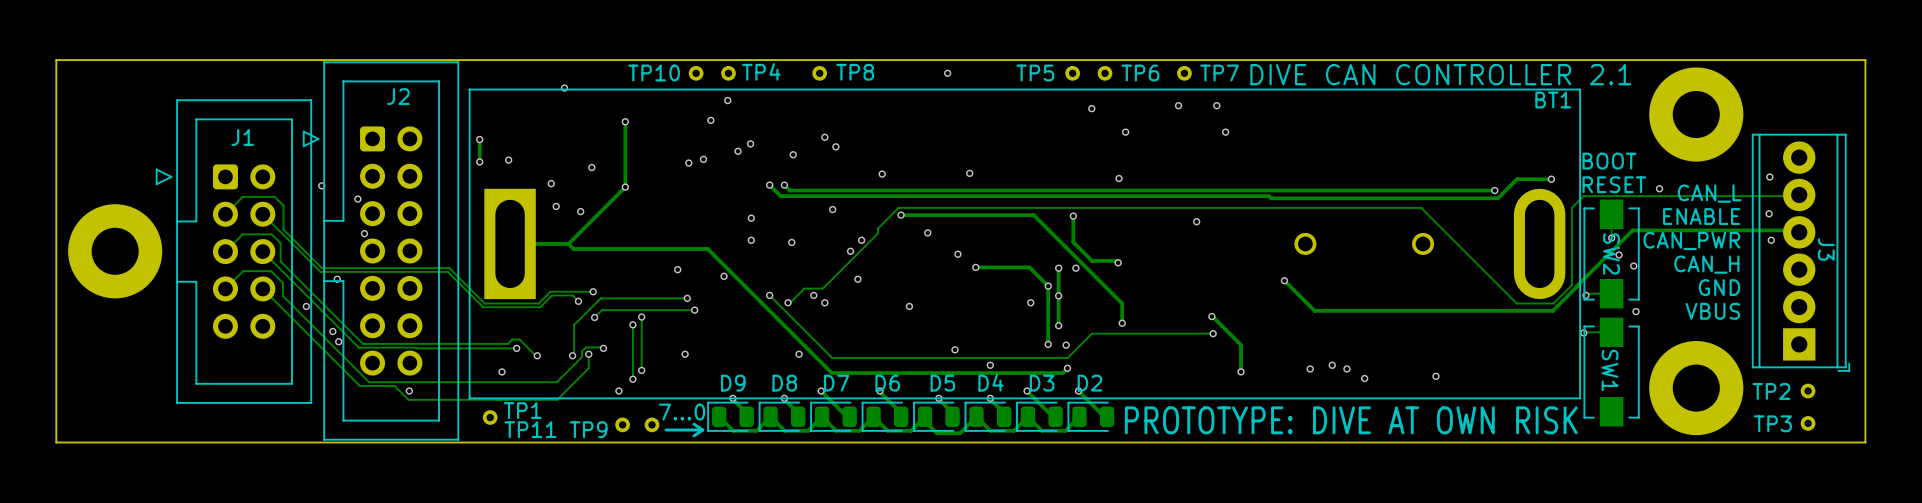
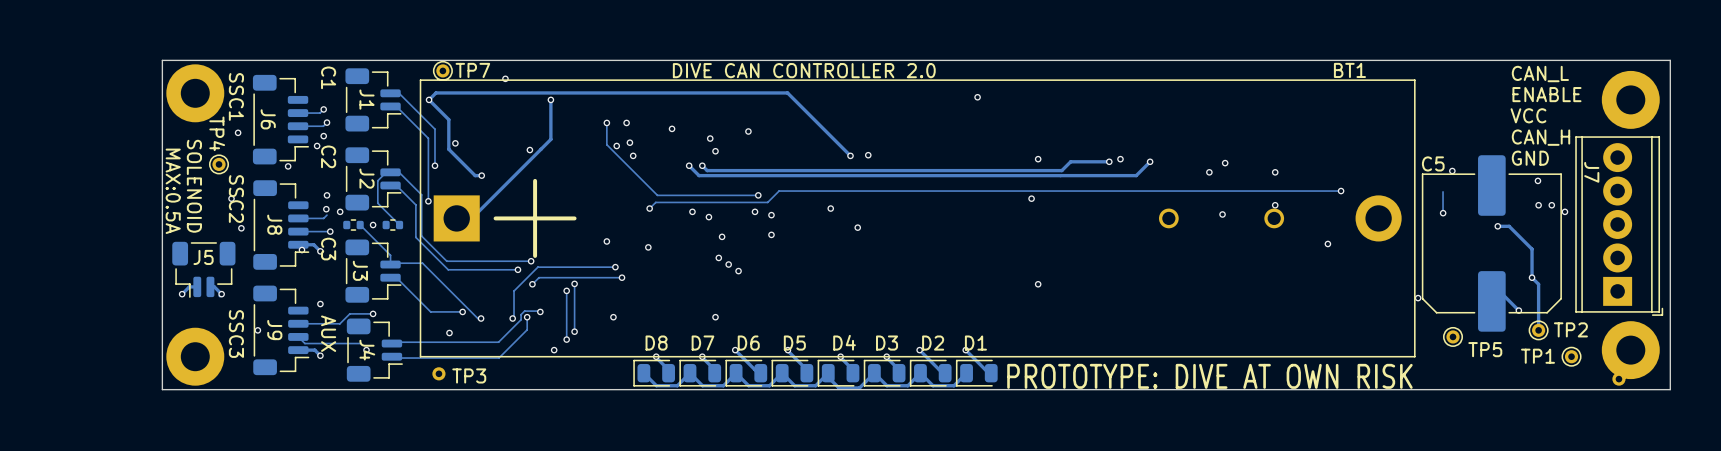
J2 footprint: [302, 61, 460, 441] -> [345, 147, 402, 211]
board edge: (1865, 67) (1865, 60) (56, 60) (56, 442) (1865, 442) (1865, 435) -> (1670, 60) (162, 60) (162, 389) (1670, 389)
text: TP4 (761, 71) -> DIVE CAN CONTROLLER 2.0 (804, 70)
text: TP8 (855, 72) -> none
text: TP10 (653, 73) -> none
part: (696, 73) -> none
TP7 side: top (728, 73) -> bottom (442, 70)
part: (819, 73) -> none
via: (947, 73) -> none
text: TP5 (1035, 73) -> none
part: (1072, 73) -> none
part: (1105, 73) -> none
text: TP6 (1140, 73) -> none
part: (1184, 73) -> none
text: TP7 (1219, 73) -> none
text: DIVE CAN CONTROLLER 2.1 (1440, 74) -> none
text: none -> C1 (328, 77)
BT1 footprint: [468, 88, 1581, 400] -> [419, 79, 1416, 358]
J2 name position: J2 (398, 96) -> J2 (367, 178)
J1 footprint: [155, 99, 313, 404] -> [345, 68, 402, 132]
BT1 name position: BT1 (1553, 99) -> BT1 (1349, 70)
via: (727, 100) -> none
track: none -> (397, 92) (434, 129) (434, 165)
part: none -> (195, 93)
via: (1178, 105) -> none
via: (1216, 105) -> none
text: none -> SSC1 (236, 96)
via: none -> (429, 99)
track: none -> (550, 99) (550, 139) (471, 218)
part: none -> (1630, 99)
part: (1696, 114) -> none
track: none -> (397, 107) (428, 138) (428, 201)
via: (710, 120) -> none
track: (625, 121) (625, 187) (568, 243) -> none
via position: (625, 121) -> (550, 99)
track: none -> (323, 109) (320, 113) (298, 113)
via: none -> (323, 109)
text: none -> VCC (1528, 115)
via: (1125, 132) -> none
via: (1225, 132) -> none
J6: none -> (280, 119)
J3 footprint: [1751, 133, 1851, 372] -> [345, 239, 402, 303]
track: none -> (327, 122) (323, 126) (298, 126)
via: none -> (327, 122)
J1 name position: J1 (242, 137) -> J1 (367, 99)
track: none -> (606, 122) (606, 144) (657, 195) (758, 195)
via: none -> (606, 122)
via: none -> (626, 122)
via: (824, 137) -> none
track: (479, 139) (479, 161) -> none
via: (479, 139) -> none
via: none -> (238, 132)
via: (738, 151) -> none
via: none -> (323, 136)
via: (479, 161) -> none
text: BOOT (1609, 161) -> none
via: none -> (317, 145)
via: none -> (715, 151)
via: none -> (633, 155)
via: (882, 174) -> none
track: none -> (850, 155) (787, 92) (436, 92) (429, 99) (448, 119) (448, 149) (475, 175) (481, 175)
via: none -> (850, 155)
text: none -> C2 (328, 156)
via: none -> (1038, 159)
via: none -> (1120, 159)
via: (1769, 177) -> none
via: (1118, 178) -> none
track: (1551, 179) (1517, 179) (1497, 198) (1271, 198) (1269, 196) -> (1150, 161) (1136, 175)
via: (1551, 179) -> none
via: none -> (1109, 161)
via: none -> (1150, 161)
via: none -> (1225, 163)
TP4: none -> (219, 164)
via: (551, 183) -> none
text: RESET (1614, 184) -> none
via: none -> (434, 165)
via: (625, 187) -> none
via: (1659, 188) -> none
track: (1494, 190) (1185, 190) -> (1110, 161) (1070, 161) (1061, 170)
via position: (1494, 190) -> (1341, 191)
via: none -> (1452, 171)
track: none -> (390, 172) (386, 172) (377, 180) (377, 203) (399, 225)
via: none -> (1209, 172)
via: none -> (1275, 172)
text position: CAN_L (1709, 193) -> CAN_L (1540, 74)
via: none -> (481, 175)
track: (1796, 196) (1583, 196) (1571, 207) (1571, 285) (1553, 303) (1516, 303) (1421, 207) (898, 207) (878, 228) (878, 233) (822, 288) (804, 288) (788, 302) -> none
via: (357, 199) -> none
line: none -> (535, 180) (535, 255)
via: none -> (1537, 180)
via: (556, 206) -> none
text: none -> SOLENOID (194, 186)
via: (832, 209) -> none
via: (580, 211) -> none
text: none -> MAX:0.5A (173, 191)
track: none -> (1341, 191) (779, 191) (767, 202) (655, 202) (649, 208)
via: (1769, 213) -> none
track: (225, 214) (242, 196) (274, 196) (283, 205) (283, 229) (322, 268) (449, 268) (484, 303) (538, 303) (550, 291) -> (397, 171) (421, 194) (421, 236) (446, 261) (492, 261)
track: (262, 214) (320, 271) (447, 271) (483, 307) (540, 307) (552, 295) (572, 295) (578, 301) -> (397, 186) (415, 204) (415, 237) (448, 269) (517, 269)
track: (901, 215) (1033, 215) (1122, 303) (1122, 323) -> none
via: (901, 215) -> none
track: (1073, 216) (1073, 242) (1092, 260) (1116, 260) (1118, 262) -> none
via: (1073, 216) -> none
text position: ENABLE (1701, 216) -> ENABLE (1546, 94)
via: none -> (327, 195)
via: (751, 218) -> none
via: none -> (758, 195)
via: none -> (231, 198)
via: none -> (1031, 198)
via: (1196, 221) -> none
text: none -> SSC2 (236, 199)
via: none -> (428, 201)
via: none -> (1275, 205)
via: none -> (1538, 205)
via: none -> (1551, 205)
track: (1799, 230) (1632, 230) (1552, 310) (1314, 310) (1284, 280) -> none
via: none -> (649, 208)
via: none -> (340, 211)
via: none -> (692, 211)
via: none -> (755, 211)
via: none -> (1564, 211)
via: none -> (1222, 214)
track: none -> (327, 215) (323, 218) (298, 218)
via: (751, 240) -> none
text: CAN_PWR (1691, 240) -> none
via: (1771, 240) -> none
track: (568, 243) (510, 243) -> none
track: (568, 243) (573, 248) (707, 248) (831, 373) (1062, 373) (1067, 368) -> none
line: none -> (574, 218) (495, 218)
J3 name position: J3 (1826, 249) -> J3 (360, 270)
part: (115, 251) -> none
track: (225, 251) (242, 234) (271, 234) (280, 243) (280, 261) (362, 343) (507, 343) (512, 339) (519, 339) (535, 355) -> (397, 263) (422, 263) (479, 318)
track: (262, 251) (358, 347) (481, 348) -> (397, 279) (430, 311)
J8: none -> (281, 225)
part: none -> (353, 225)
track: none -> (360, 225) (390, 255) (390, 264)
via: none -> (373, 225)
part: none -> (392, 225)
via: (850, 251) -> none
track: none -> (1497, 226) (1509, 226) (1532, 249) (1532, 277) (1538, 284) (1538, 323)
via: none -> (1497, 226)
J7: none -> (1619, 226)
via: none -> (241, 228)
SW2: (1611, 254) -> none
via: (1619, 254) -> none
track: none -> (330, 231) (298, 231)
via: none -> (330, 231)
via: none -> (771, 234)
via: (1118, 262) -> none
via: none -> (722, 236)
text position: CAN_H (1706, 264) -> CAN_H (1541, 137)
via: (1633, 266) -> none
track: (975, 267) (1029, 267) (1048, 286) (1048, 344) -> none
via: (975, 267) -> none
track: (1058, 268) (1058, 325) -> none
via: (1058, 268) -> none
via: (1075, 268) -> none
C5: none -> (1491, 243)
via: none -> (1327, 243)
track: none -> (298, 244) (313, 244) (320, 251)
text: none -> C3 (328, 249)
via: (857, 279) -> none
via: none -> (320, 251)
via: (1284, 280) -> none
via: (1048, 286) -> none
text position: GND (1719, 287) -> GND (1530, 158)
track: (225, 288) (243, 271) (271, 271) (282, 283) (282, 296) (369, 382) (445, 382) -> none
track: (262, 288) (359, 385) (394, 385) (408, 399) (445, 399) -> none
via: none -> (718, 257)
track: (1611, 293) (1587, 294) -> none
track: (769, 295) (832, 357) (1067, 357) (1091, 333) (1213, 333) -> none
via: (769, 295) -> none
via: (1058, 295) -> none
via: (1585, 295) -> none
J5: none -> (203, 269)
via: (788, 302) -> none
via: (1030, 302) -> none
via: (306, 306) -> none
via: (909, 306) -> none
via: none -> (1532, 277)
via: (1635, 311) -> none
text: VBUS (1712, 311) -> none
track: (1211, 316) (1241, 344) (1241, 371) -> none
via: (1211, 316) -> none
track: none -> (1492, 282) (1518, 310)
via: none -> (1038, 284)
track: none -> (197, 286) (189, 286) (182, 294)
track: none -> (210, 286) (214, 286) (221, 294) (219, 295)
via: (1122, 323) -> none
via: (1058, 325) -> none
via: none -> (182, 294)
via: none -> (221, 294)
via: (332, 331) -> none
track: (1611, 332) (1583, 332) -> none
via: (1213, 333) -> none
via: none -> (320, 304)
via: (338, 341) -> none
via: (1048, 344) -> none
via: (1066, 345) -> none
via: none -> (1518, 310)
via: (954, 349) -> none
track: none -> (373, 313) (349, 313) (339, 323) (298, 323)
via: none -> (373, 313)
via: (990, 365) -> none
via: (1332, 365) -> none
via: none -> (257, 330)
J9: none -> (281, 330)
via: (1067, 368) -> none
via: (1310, 368) -> none
via: (1346, 368) -> none
TP2: none -> (1538, 330)
via: (1241, 371) -> none
text: none -> AUX (328, 333)
SW1: (1611, 372) -> none
text: none -> SSC3 (236, 334)
track: none -> (298, 336) (304, 343) (359, 343)
via: (1435, 376) -> none
TP5: none -> (1453, 336)
via: (1364, 378) -> none
D4 name: D4 (990, 382) -> D3 (887, 343)
D9 name: D9 (733, 383) -> D8 (656, 343)
D8 name: D8 (784, 383) -> D7 (702, 343)
D7 name: D7 (836, 383) -> D6 (748, 343)
D6 name: D6 (887, 383) -> D5 (794, 343)
D5 name: D5 (942, 383) -> D4 (844, 342)
D3 name: D3 (1042, 383) -> D2 (933, 343)
D2 name: D2 (1089, 383) -> D1 (975, 343)
part footprint: [1800, 383, 1816, 399] -> [1601, 321, 1660, 380]
part: (1696, 388) -> none
track: none -> (298, 350) (314, 350) (320, 355)
J4: none -> (374, 350)
text: TP2 (1771, 391) -> none
via: none -> (320, 355)
part: none -> (195, 356)
TP1: none -> (1571, 356)
text: TP1 (522, 410) -> TP3 (469, 375)
text: 7...0 (682, 412) -> none
text: TP3 (1772, 423) -> none
part: (622, 424) -> none
part: (652, 424) -> none
line: (693, 424) (702, 430) -> none
text: TP11 TP9 (556, 429) -> none
line: (702, 430) (665, 430) -> none
line: (702, 430) (693, 435) -> none

